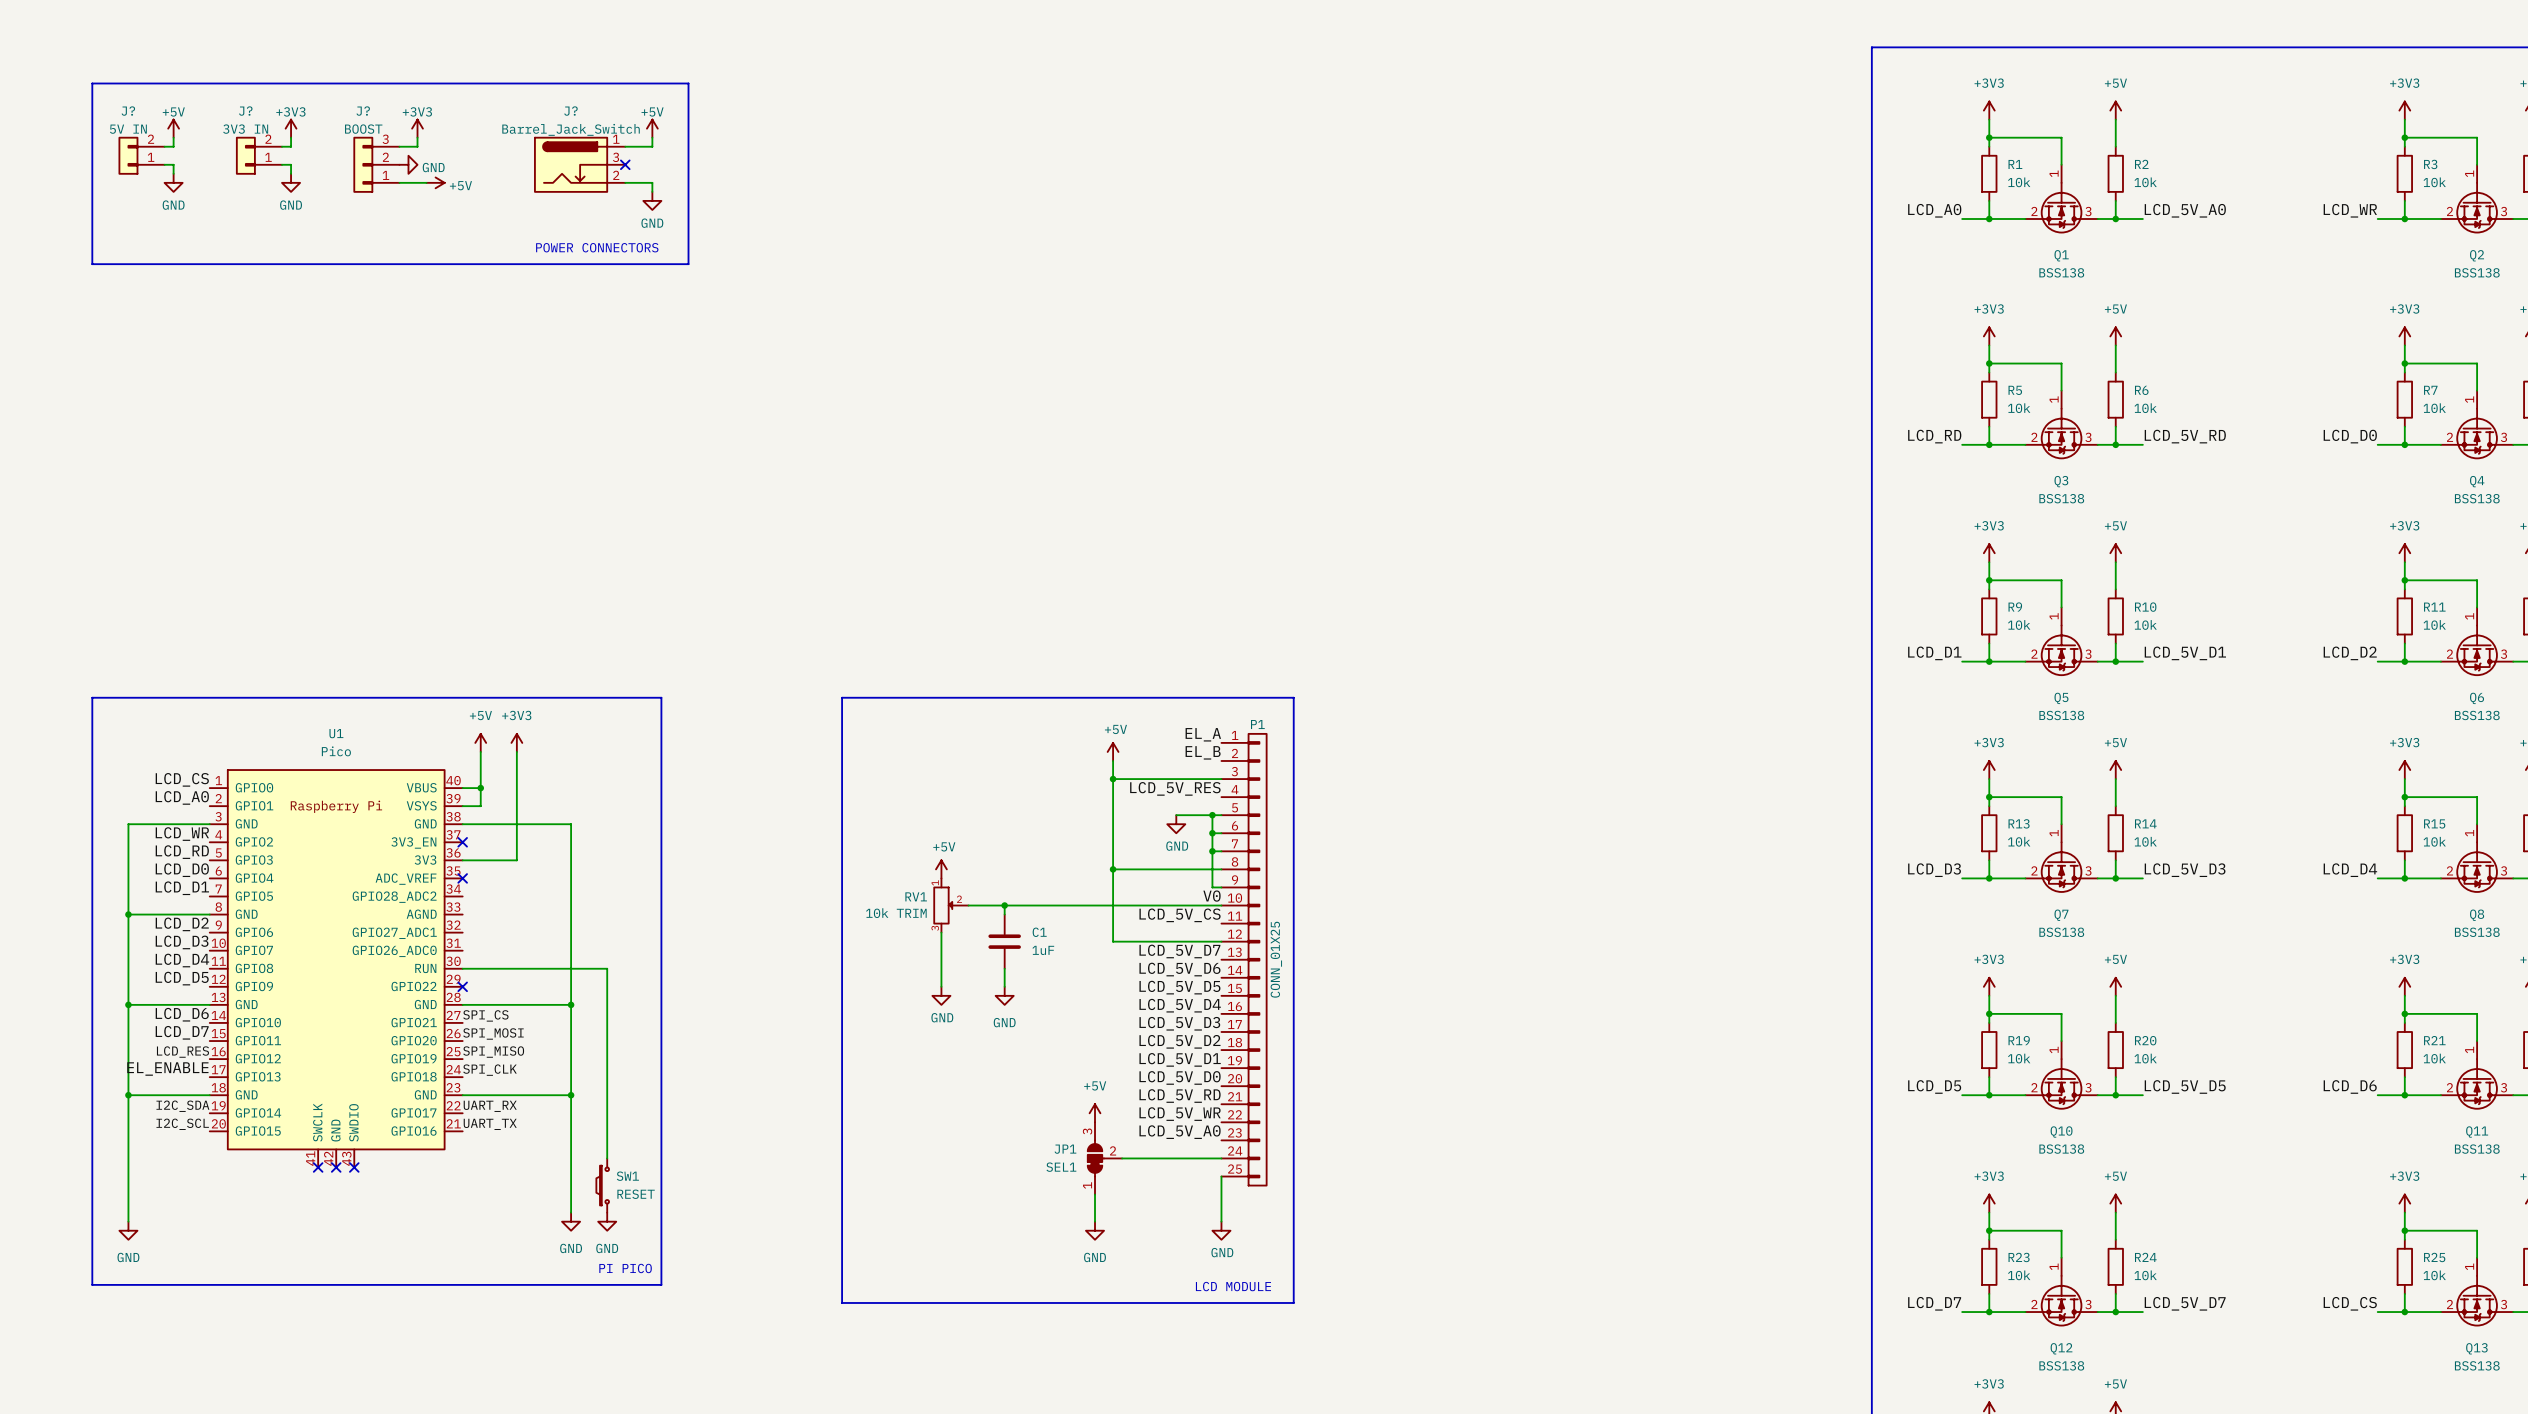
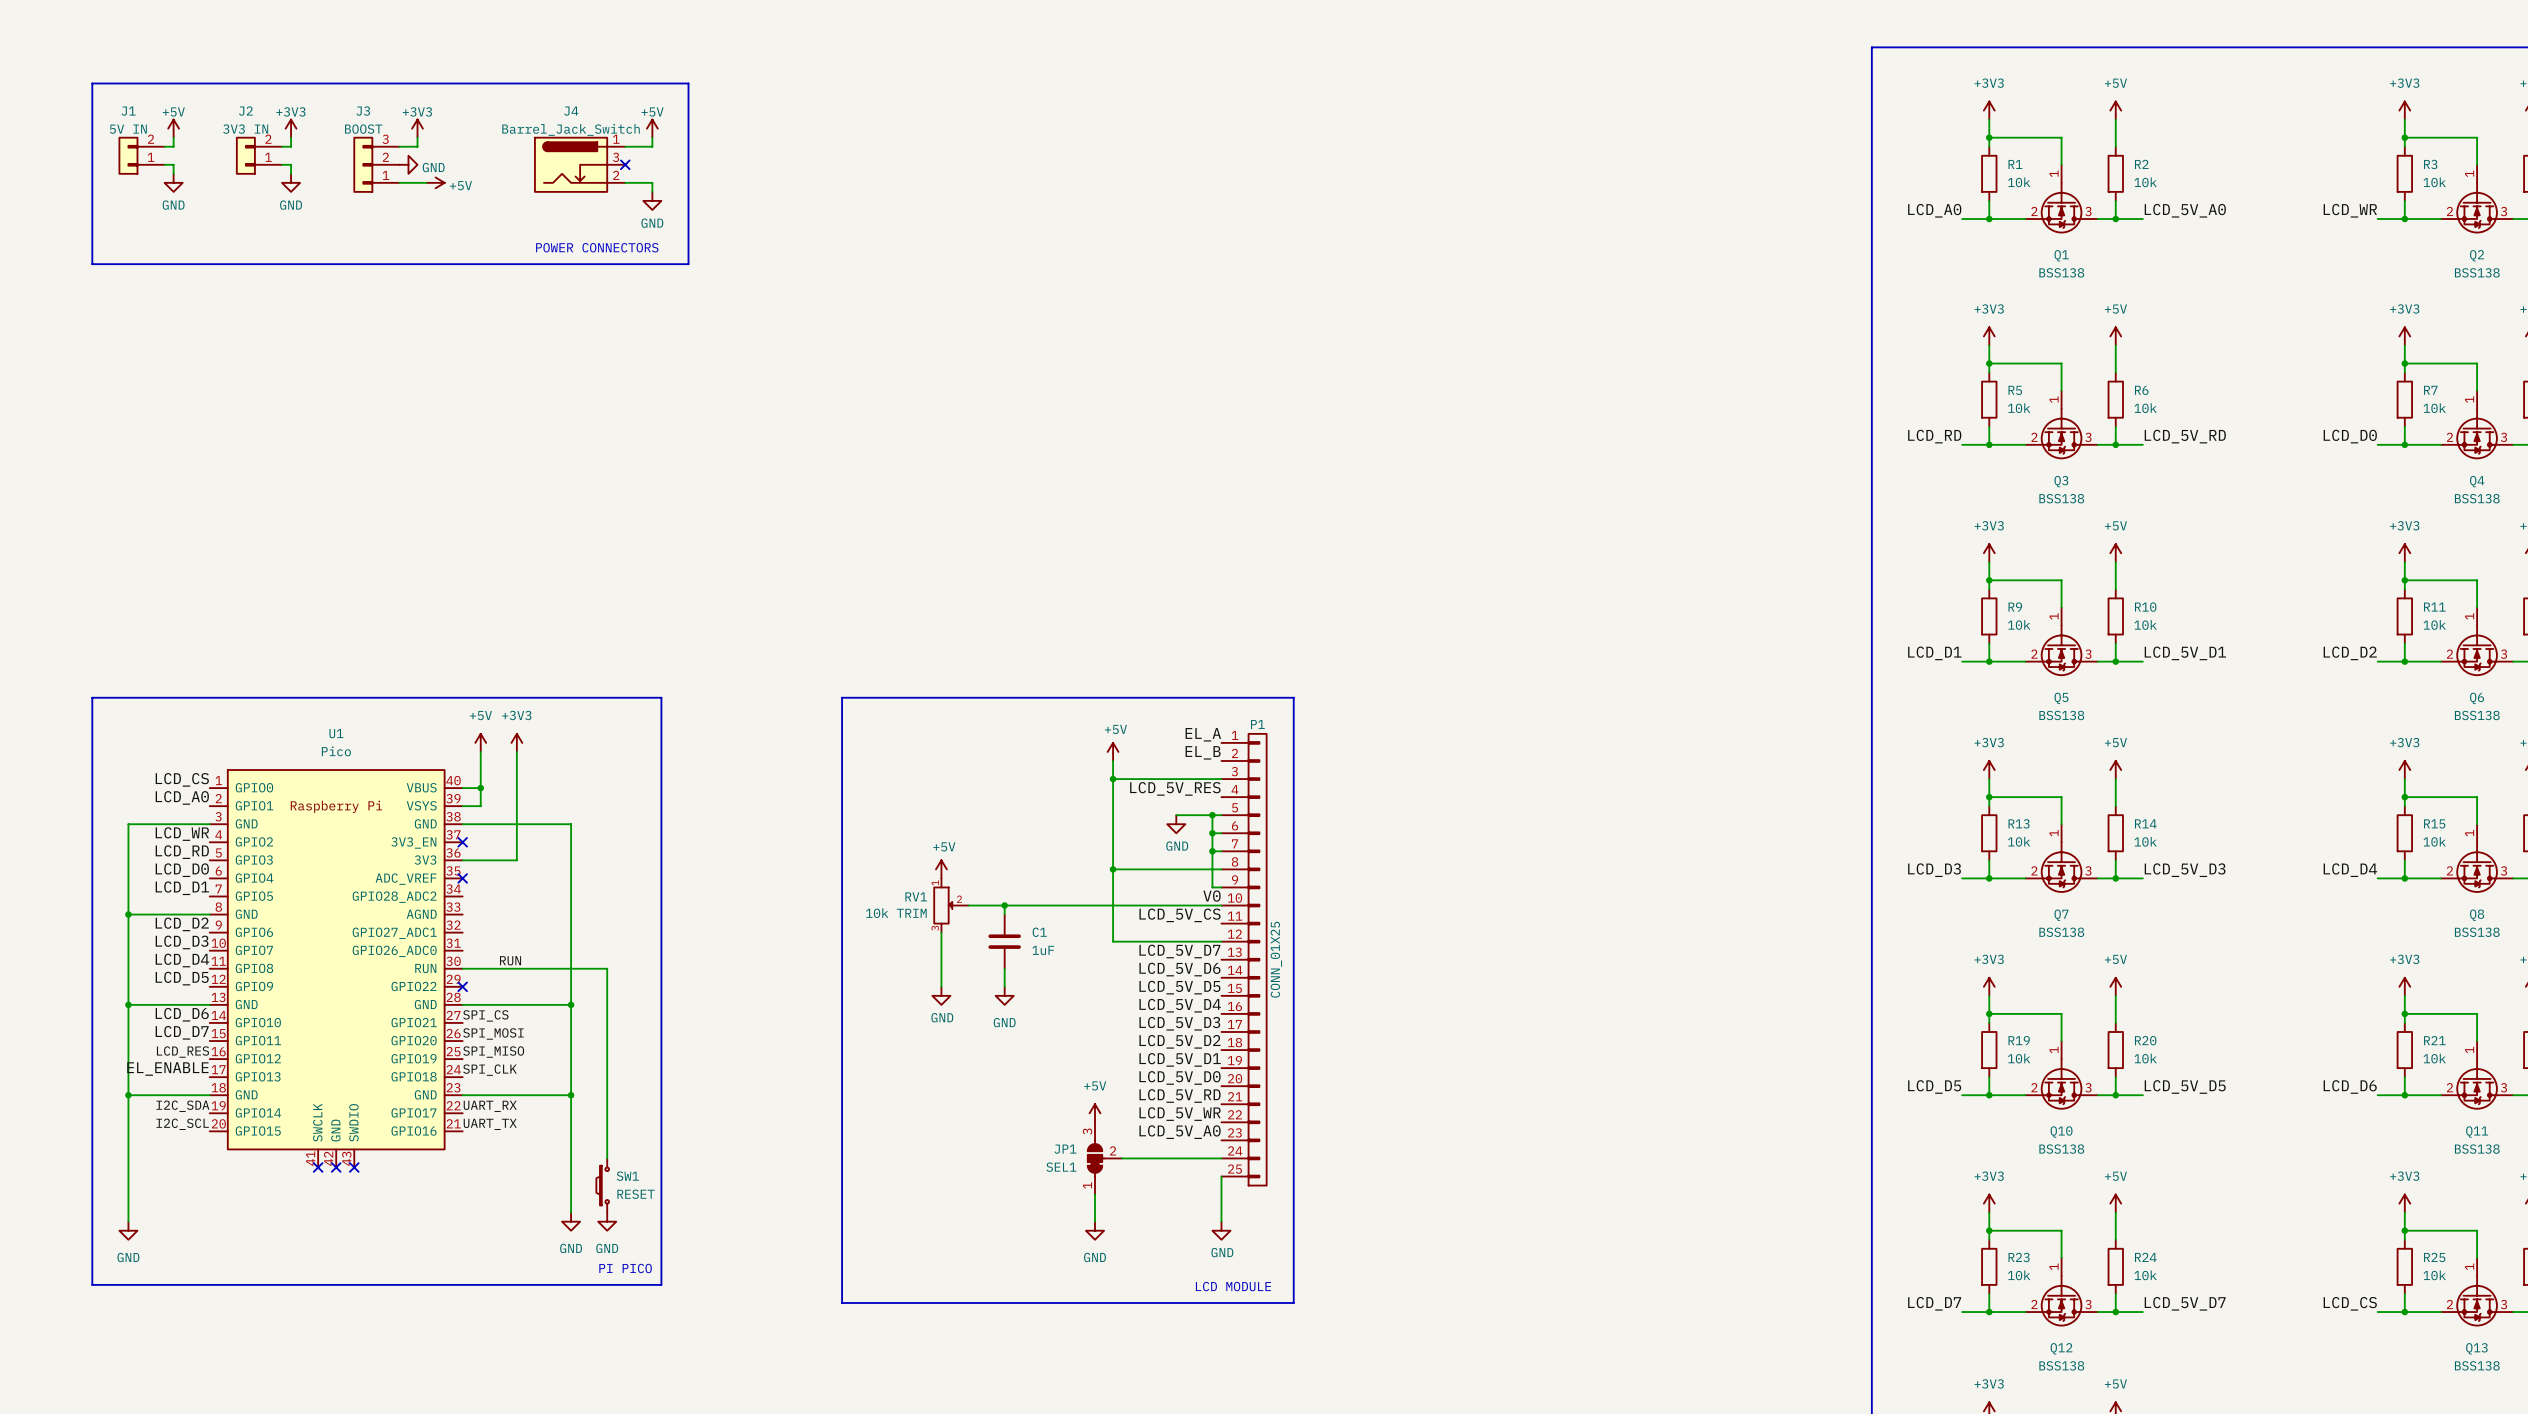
J? name: J? (128, 111) -> J1 (128, 111)
J? name: J? (245, 111) -> J2 (245, 111)
J? name: J? (363, 111) -> J3 (363, 111)
J? name: J? (570, 111) -> J4 (571, 111)
label: none -> RUN (510, 960)

